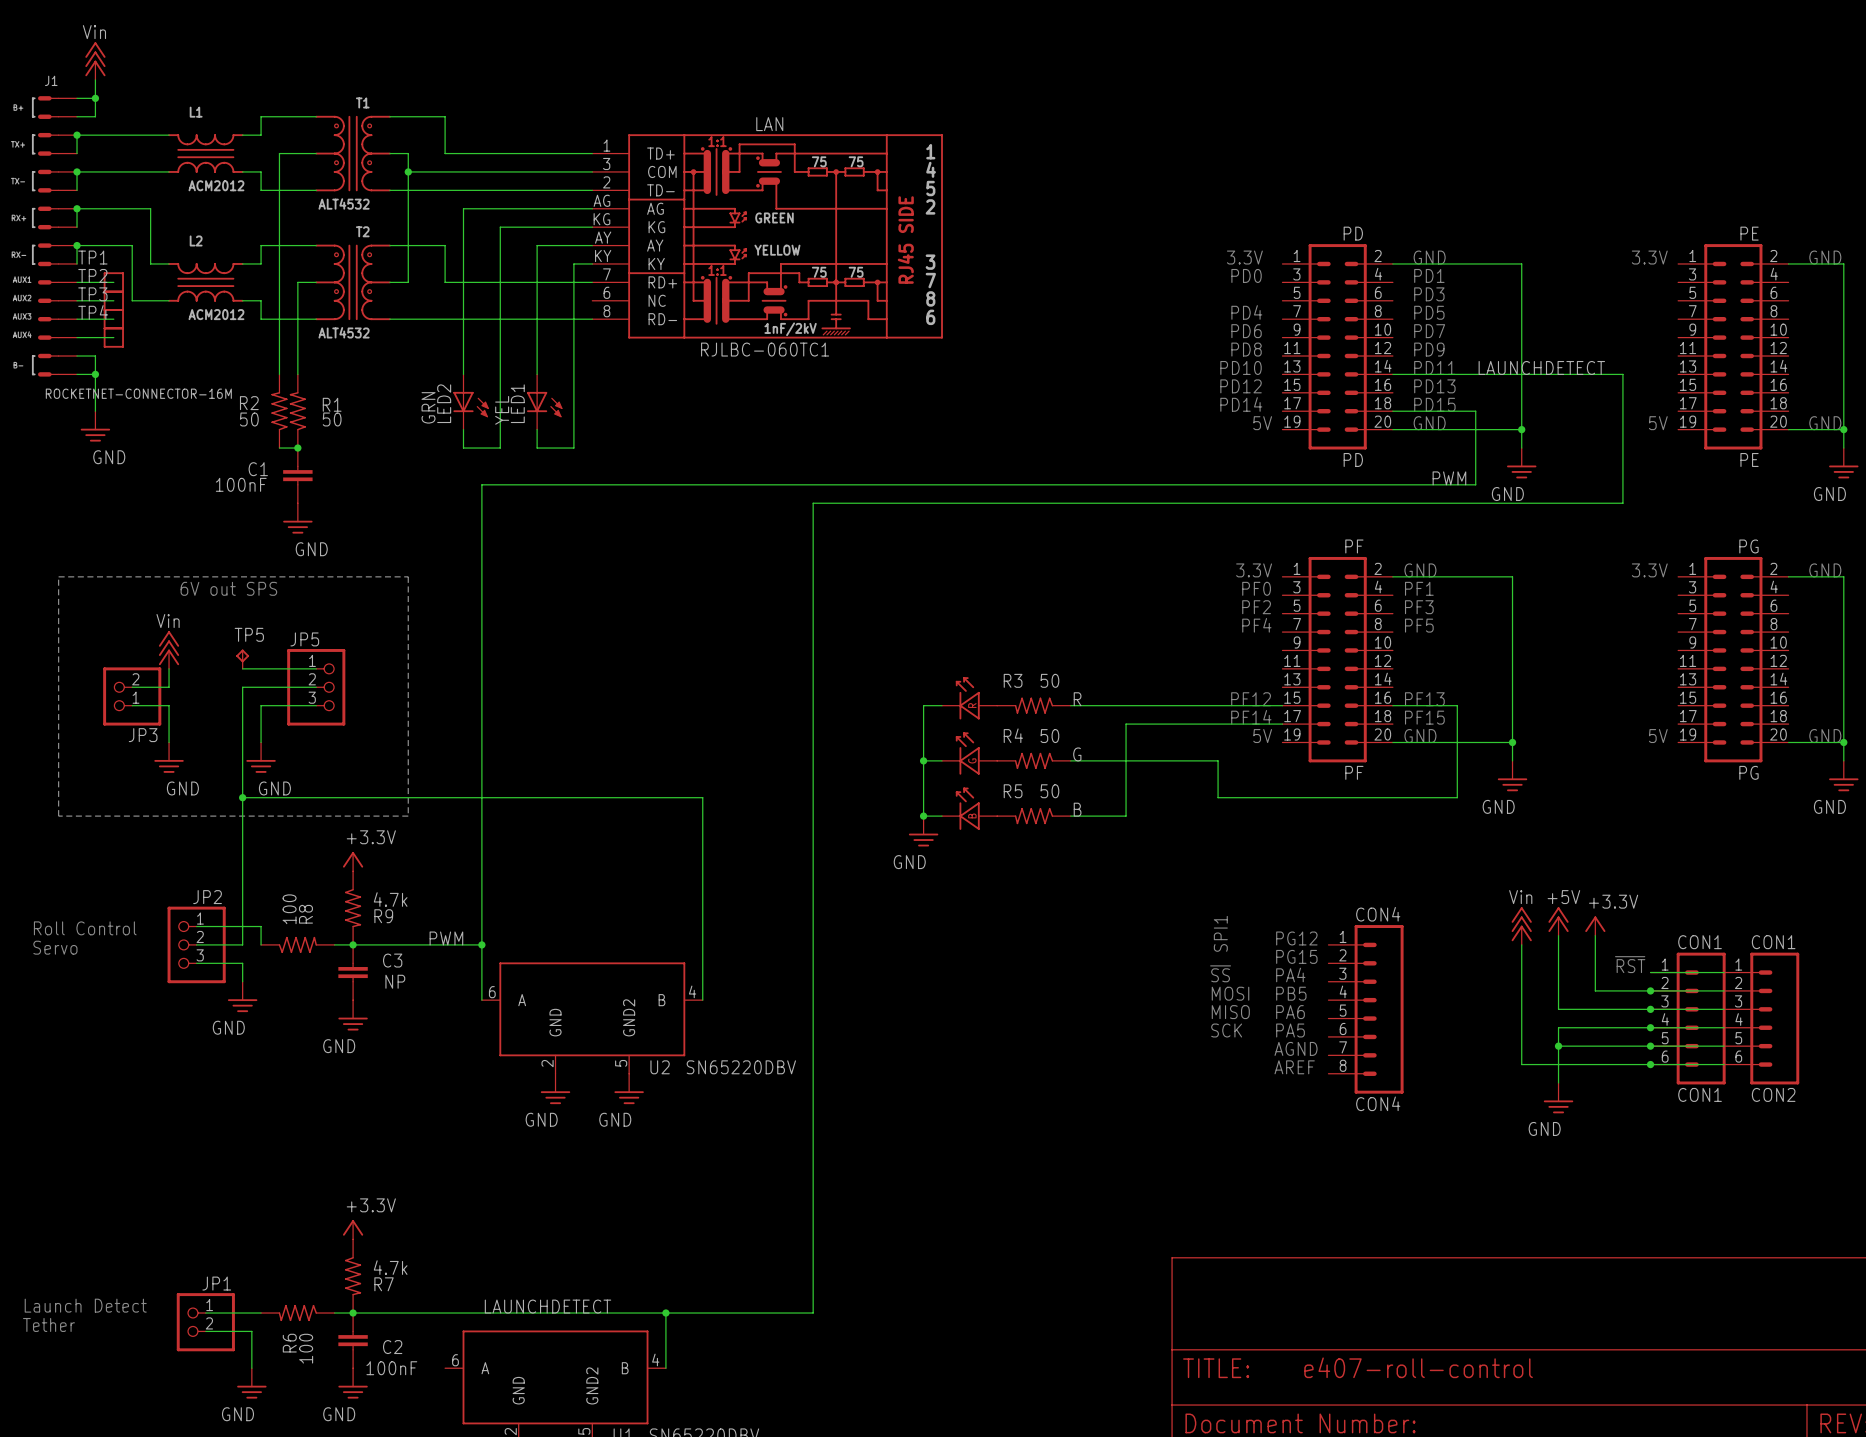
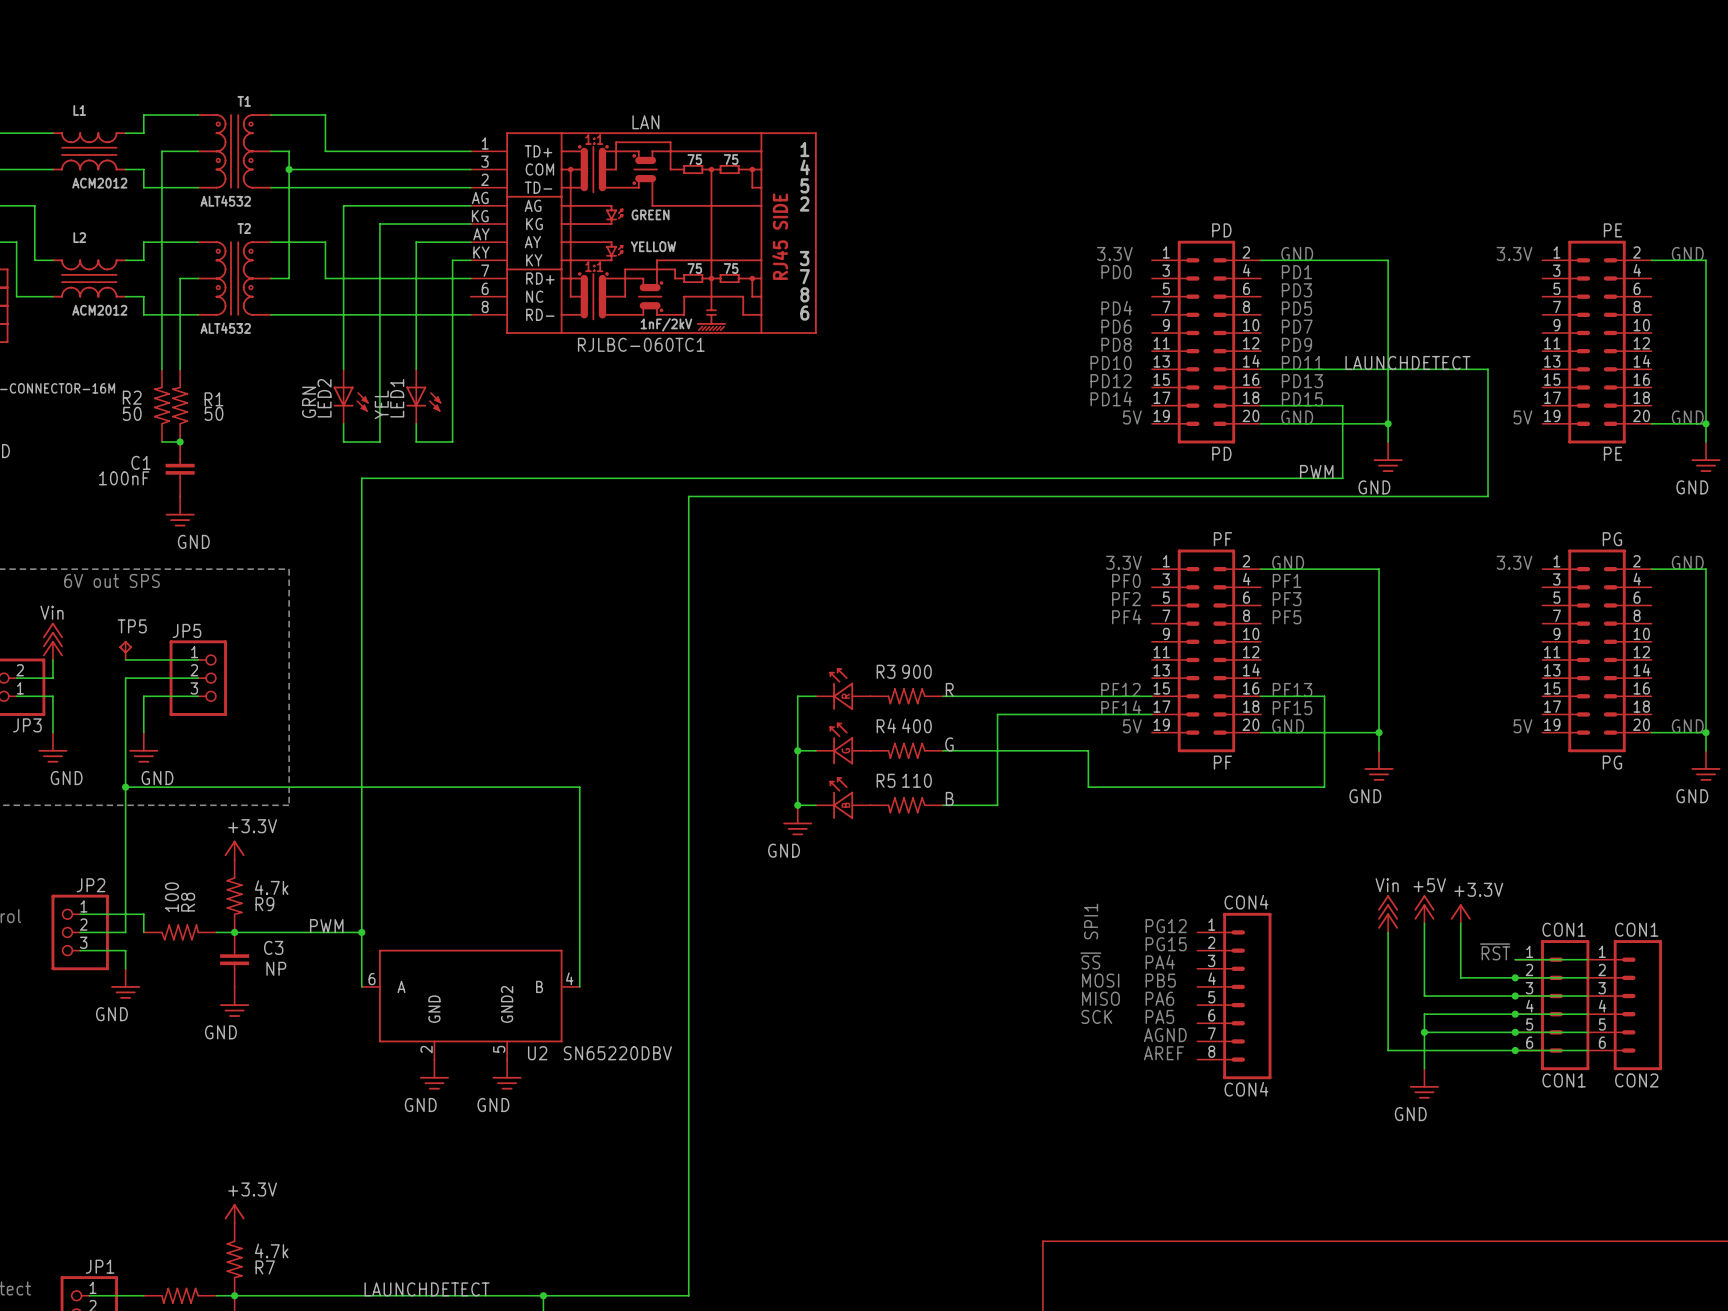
R3 value: 50 (1049, 680) -> 900 (916, 671)
R4 value: 50 (1049, 736) -> 400 (916, 725)
R5 value: 50 (1049, 791) -> 110 (916, 780)

